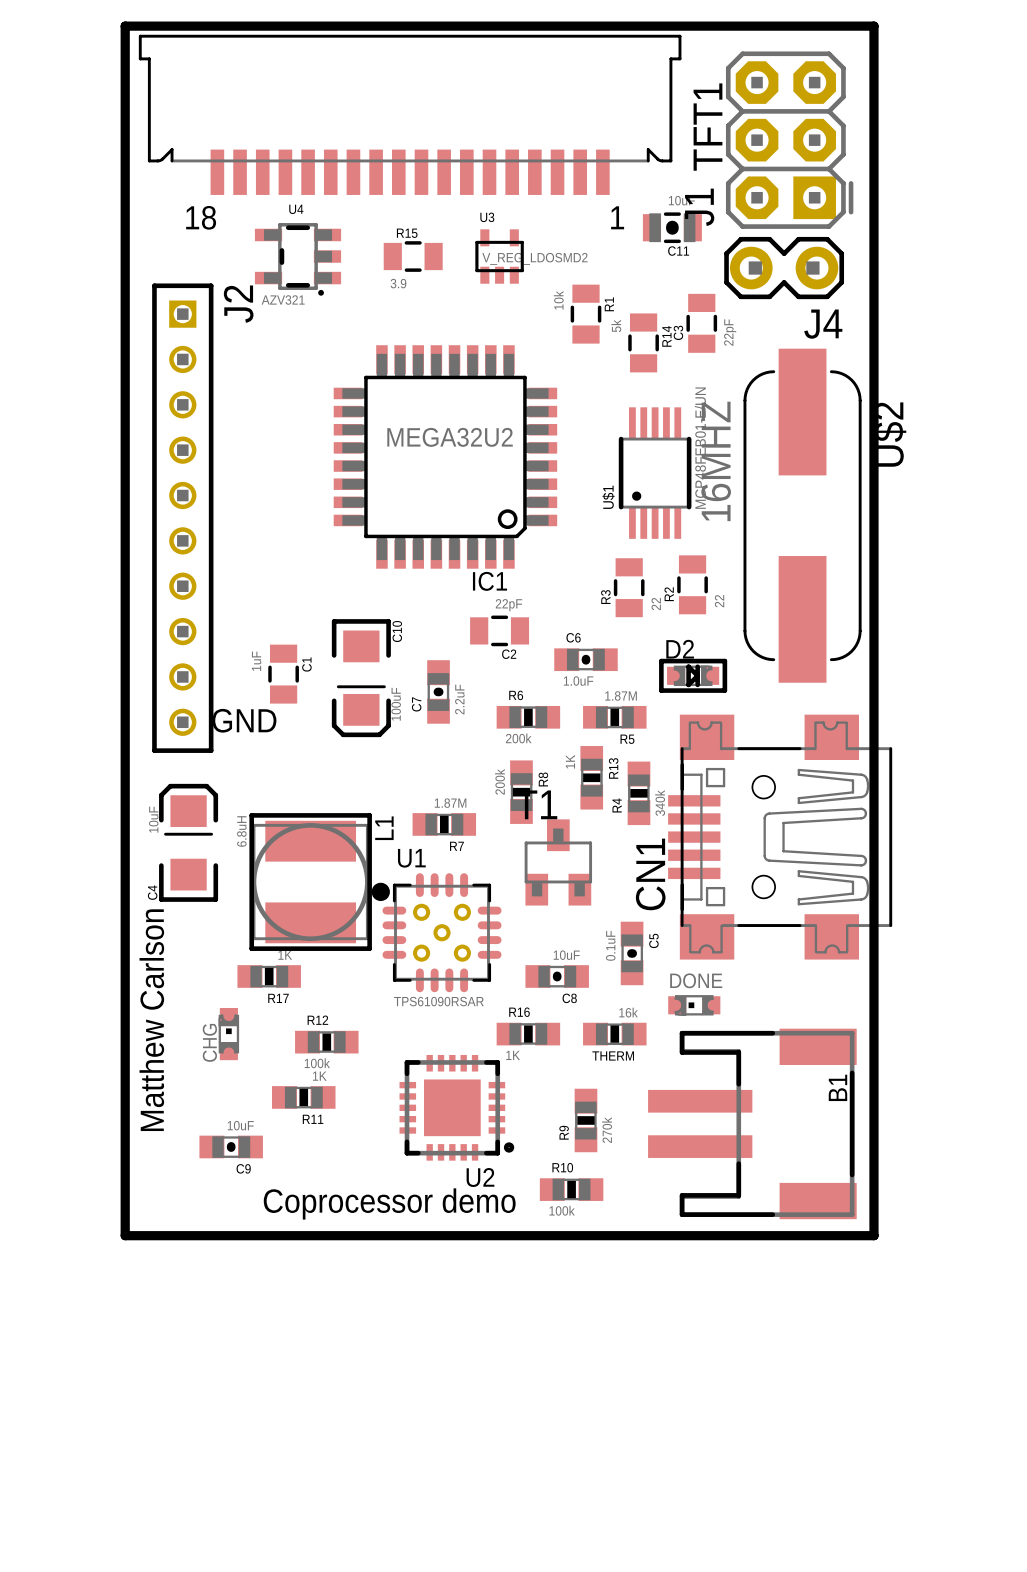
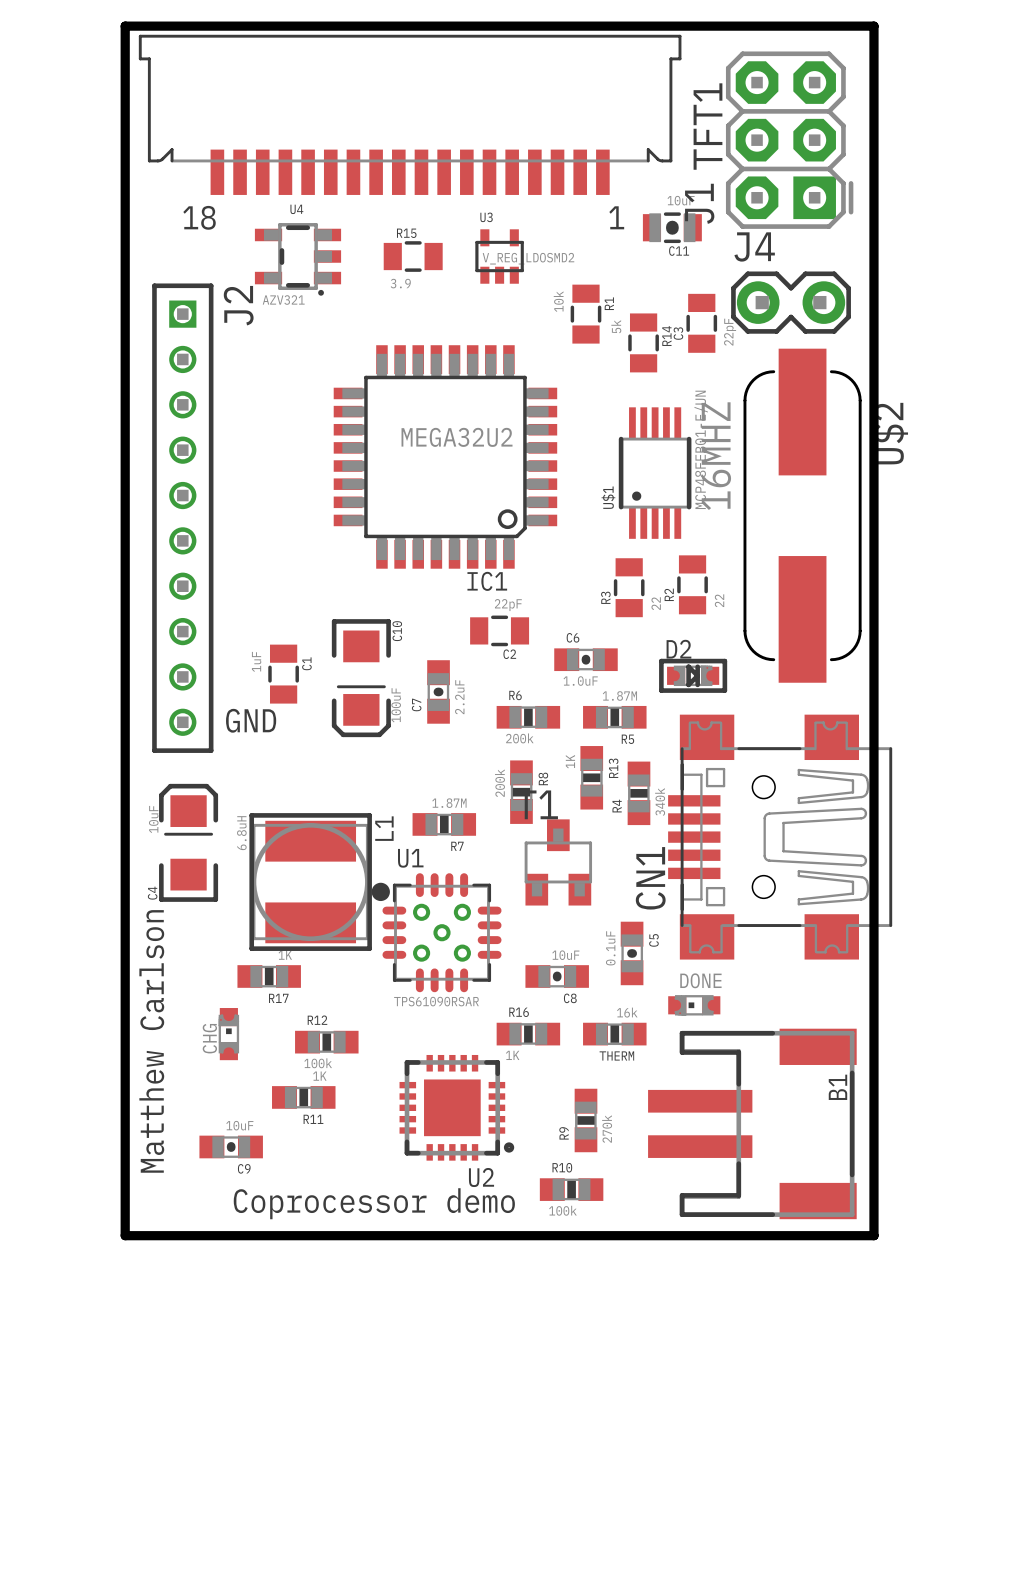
J4 position: (784, 268) -> (791, 302)
J4 name position: J4 (823, 324) -> J4 (754, 246)

